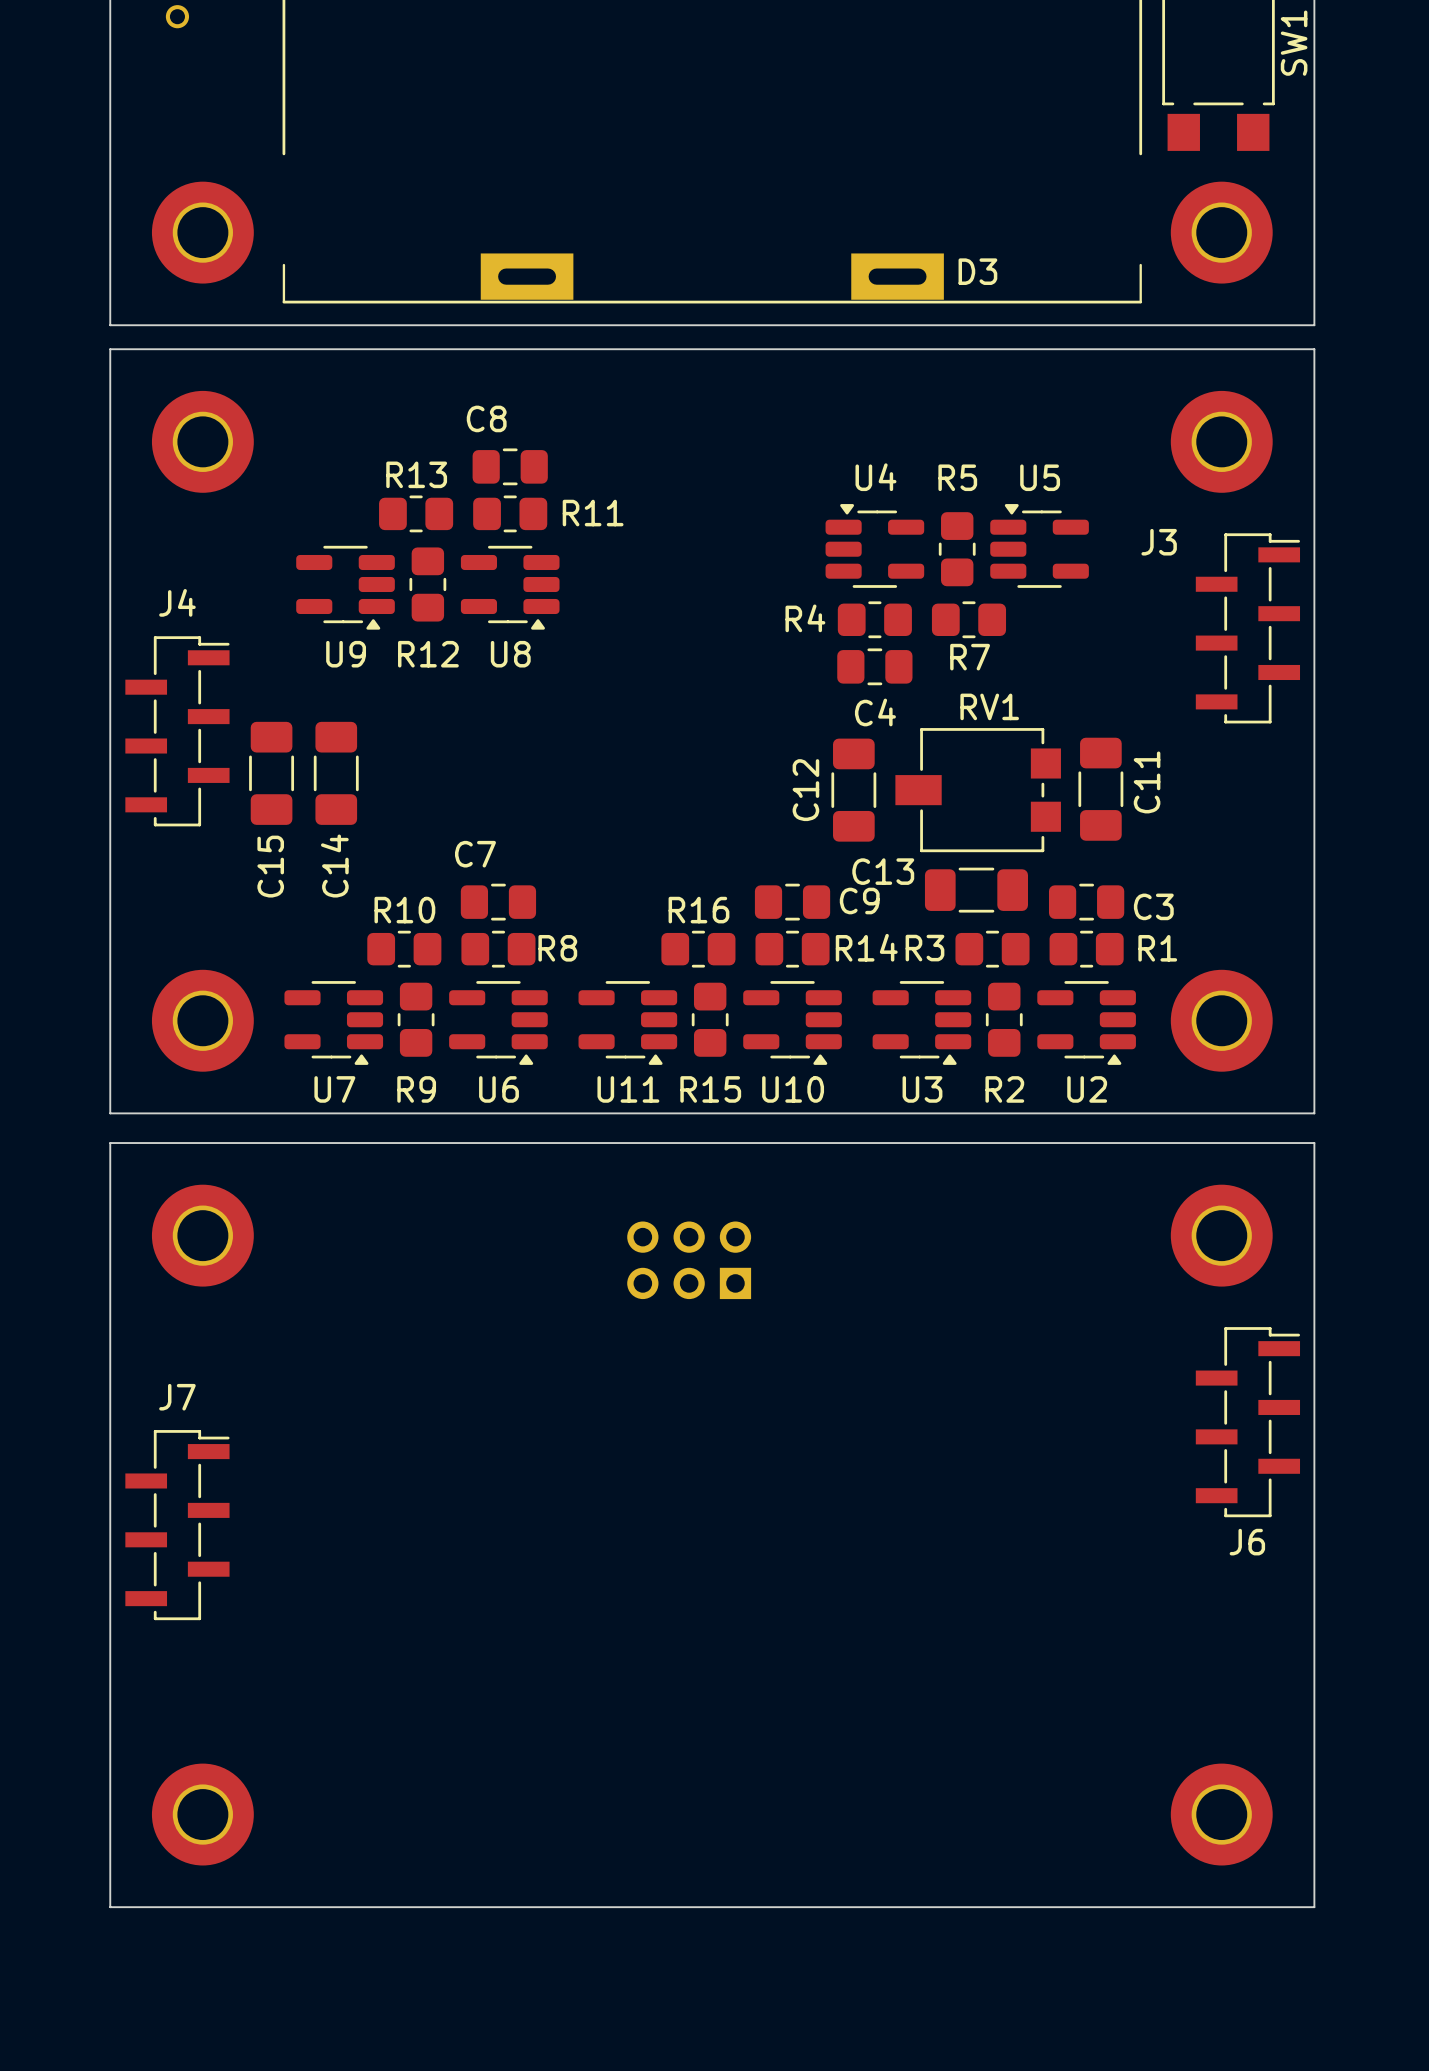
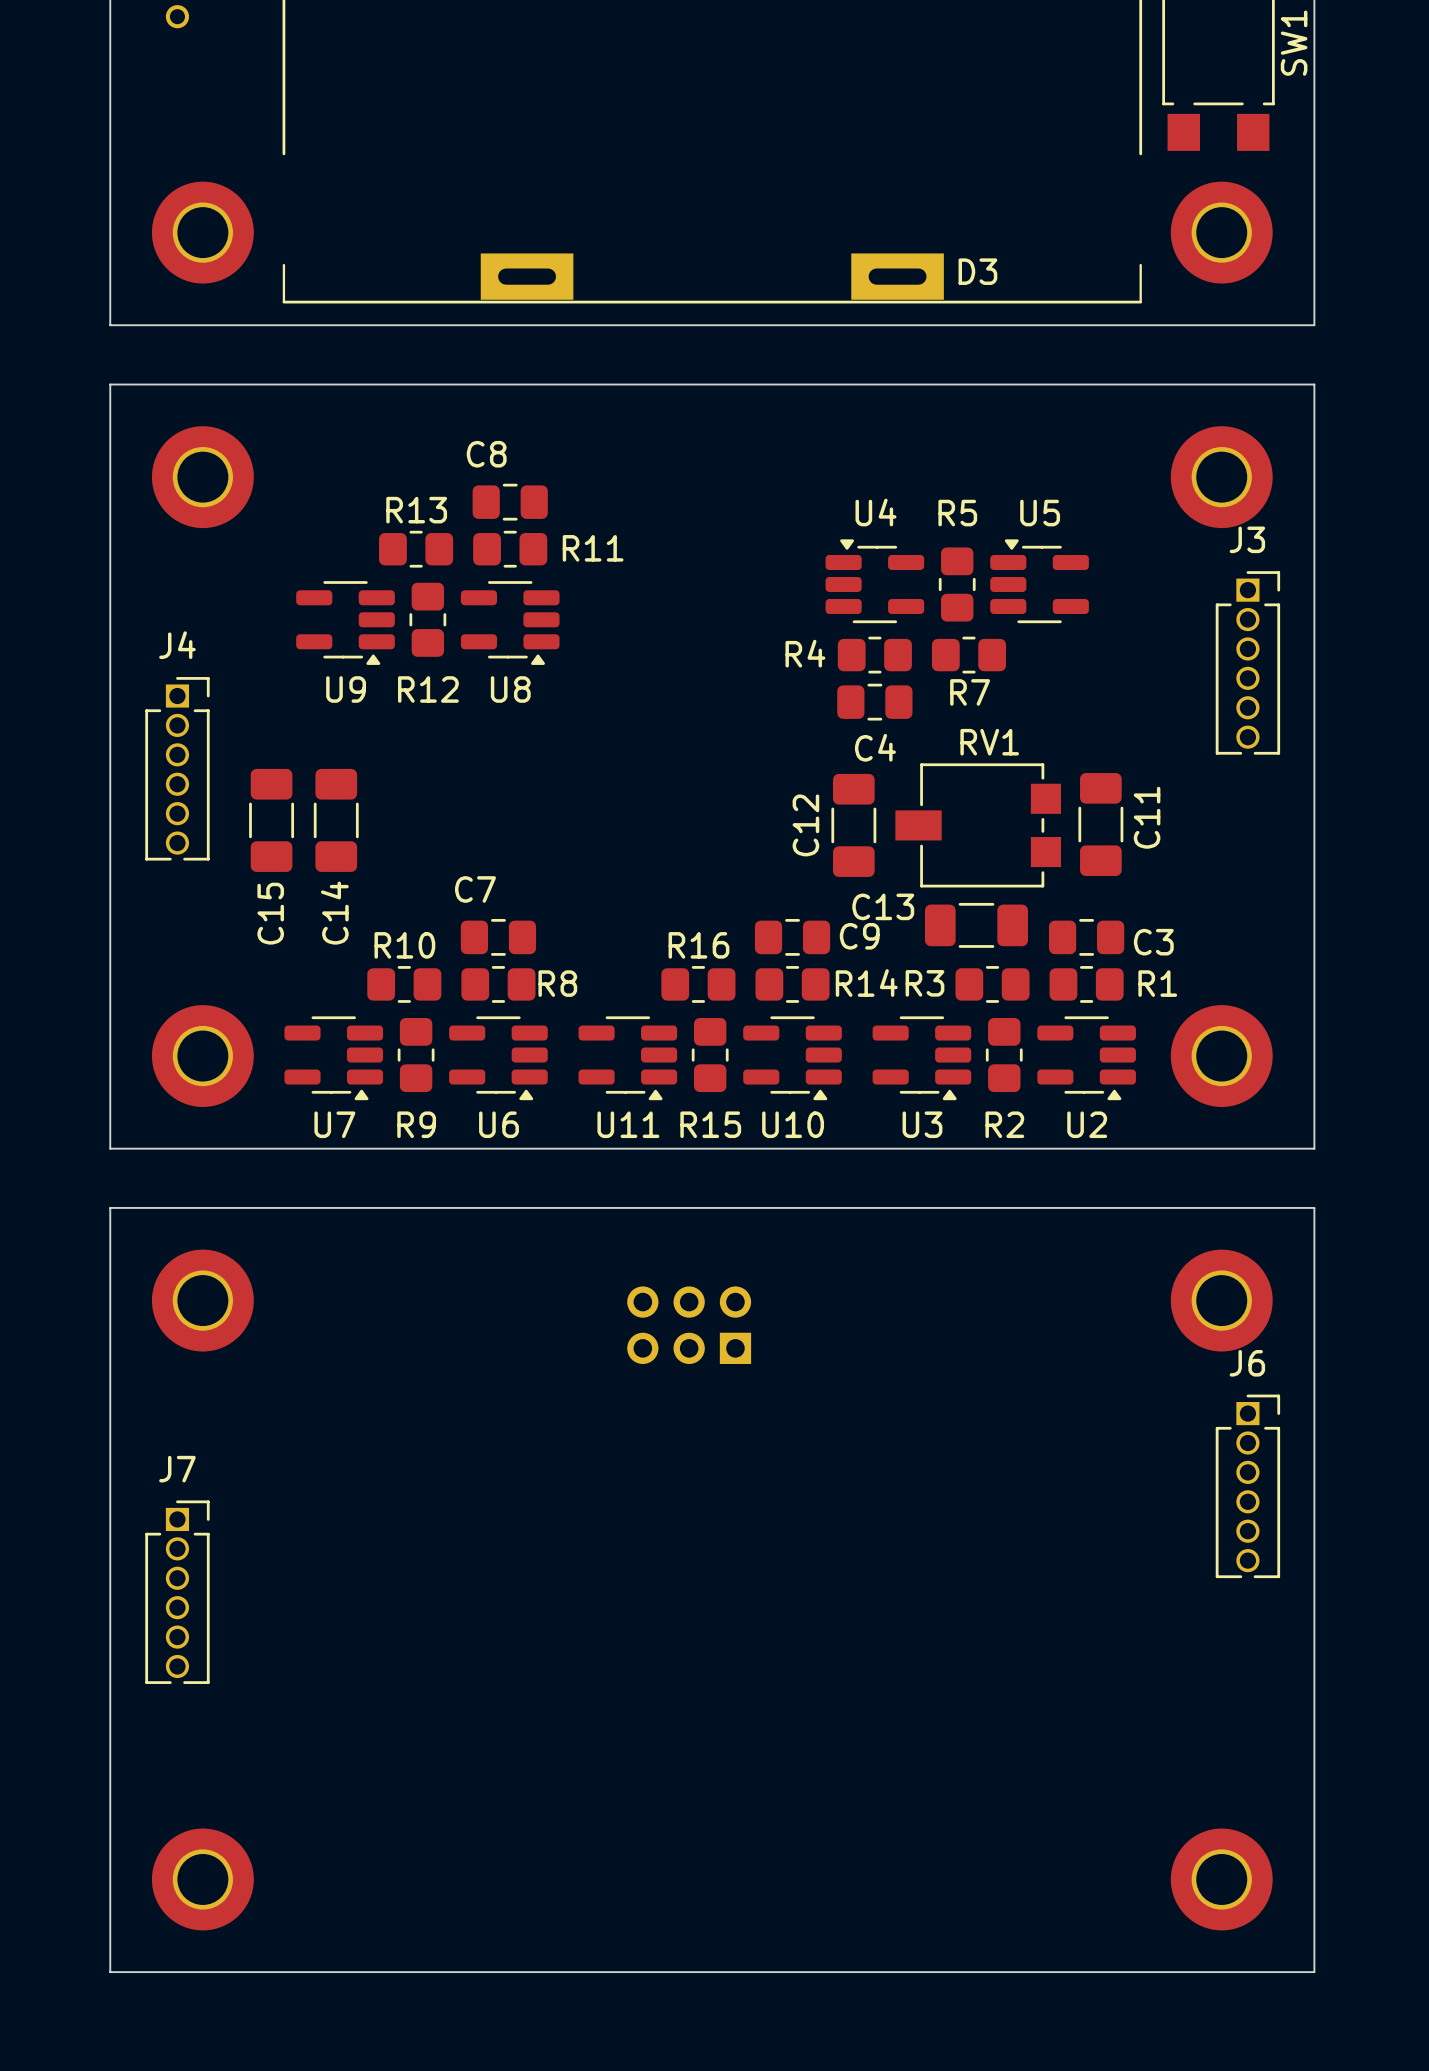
board edge: (110, 384) (110, 349) (1314, 349) (1314, 384) -> (110, 384) (1314, 384)
part position: (202, 441) -> (202, 477)
part position: (1221, 441) -> (1221, 477)
C8 position: (510, 466) -> (510, 502)
R13 position: (416, 513) -> (416, 549)
R11 position: (510, 513) -> (510, 549)
J3 footprint: [1195, 533, 1301, 724] -> [1215, 571, 1281, 755]
J3 name position: J3 (1159, 542) -> J3 (1247, 539)
U4 position: (874, 545) -> (874, 581)
U5 position: (1039, 545) -> (1039, 581)
R5 position: (957, 549) -> (957, 584)
R12 position: (427, 584) -> (427, 619)
U9 position: (345, 587) -> (345, 623)
U8 position: (510, 587) -> (510, 623)
R4 position: (874, 619) -> (874, 655)
R7 position: (968, 619) -> (968, 655)
J4 footprint: [125, 636, 230, 827] -> [145, 677, 210, 861]
C4 position: (874, 666) -> (874, 702)
C15 position: (271, 773) -> (271, 820)
C14 position: (336, 773) -> (336, 820)
C11 position: (1100, 789) -> (1100, 824)
C12 position: (853, 790) -> (853, 825)
RV1 position: (978, 790) -> (978, 825)
C13 position: (976, 890) -> (976, 925)
C7 position: (498, 902) -> (498, 937)
C9 position: (792, 902) -> (792, 937)
C3 position: (1086, 902) -> (1086, 937)
R10 position: (404, 949) -> (404, 984)
R8 position: (498, 949) -> (498, 984)
R16 position: (698, 949) -> (698, 984)
R14 position: (792, 949) -> (792, 984)
R3 position: (992, 949) -> (992, 984)
R1 position: (1086, 949) -> (1086, 984)
R9 position: (416, 1019) -> (416, 1055)
R15 position: (710, 1019) -> (710, 1055)
R2 position: (1004, 1019) -> (1004, 1055)
part position: (202, 1020) -> (202, 1056)
part position: (1221, 1020) -> (1221, 1056)
U7 position: (333, 1022) -> (333, 1058)
U6 position: (498, 1022) -> (498, 1058)
U11 position: (627, 1022) -> (627, 1058)
U10 position: (792, 1022) -> (792, 1058)
U3 position: (921, 1022) -> (921, 1058)
U2 position: (1086, 1022) -> (1086, 1058)
board edge: (110, 1113) (1314, 1113) -> (110, 1113) (110, 1143)
board edge: (110, 1143) (1314, 1143) -> (1314, 1113) (1314, 1143)
board edge: (110, 1148) (110, 1207) -> (110, 1148) (1314, 1148)
board edge: (1314, 1148) (1314, 1207) -> (110, 1207) (1314, 1207)
part position: (202, 1235) -> (202, 1300)
part position: (1221, 1235) -> (1221, 1300)
part position: (689, 1260) -> (689, 1325)
J6 footprint: [1195, 1327, 1301, 1518] -> [1215, 1394, 1281, 1579]
J7 footprint: [125, 1430, 230, 1621] -> [145, 1500, 210, 1684]
J6 name position: J6 (1247, 1542) -> J6 (1247, 1363)
part position: (202, 1814) -> (202, 1879)
part position: (1221, 1814) -> (1221, 1879)
board edge: (110, 1907) (1314, 1907) -> (110, 1907) (110, 1972) (1314, 1972) (1314, 1907)

